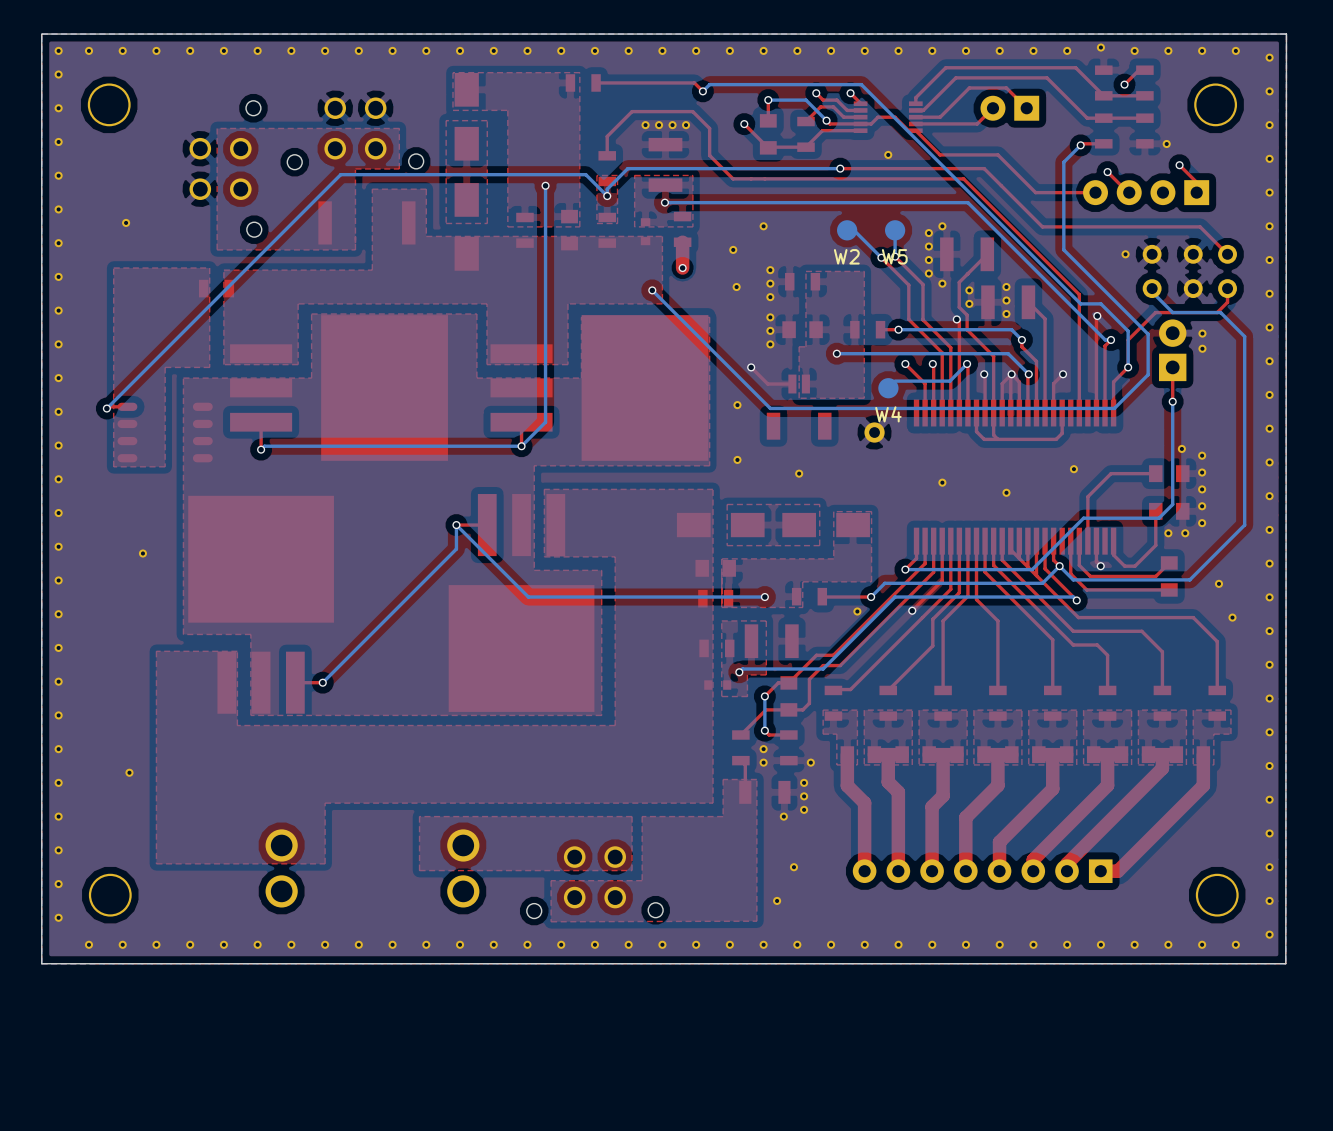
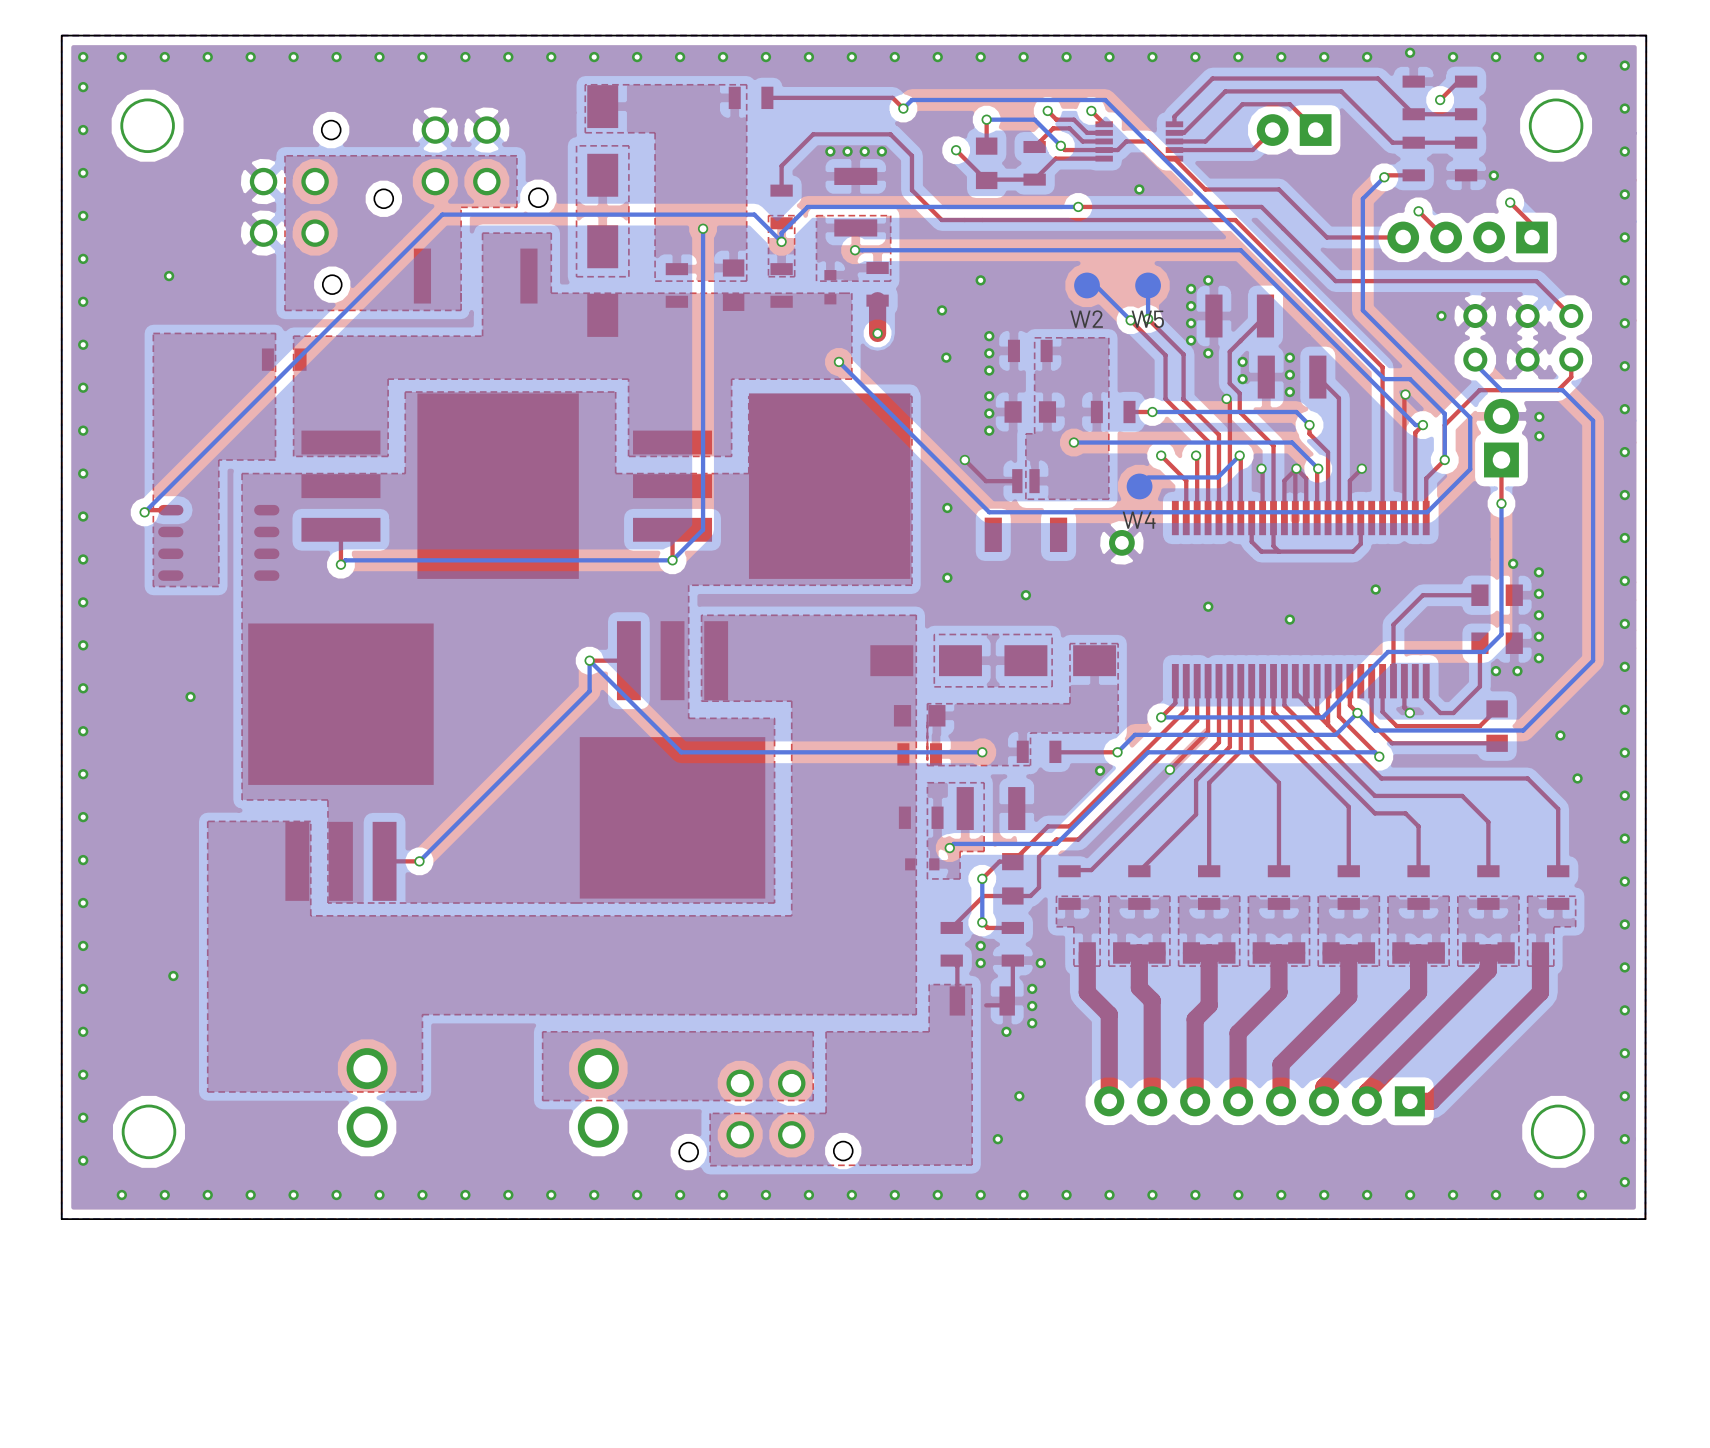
top track: none -> (1012, 960) (1012, 1000)
top track: none -> (1008, 1005) (986, 1005)

